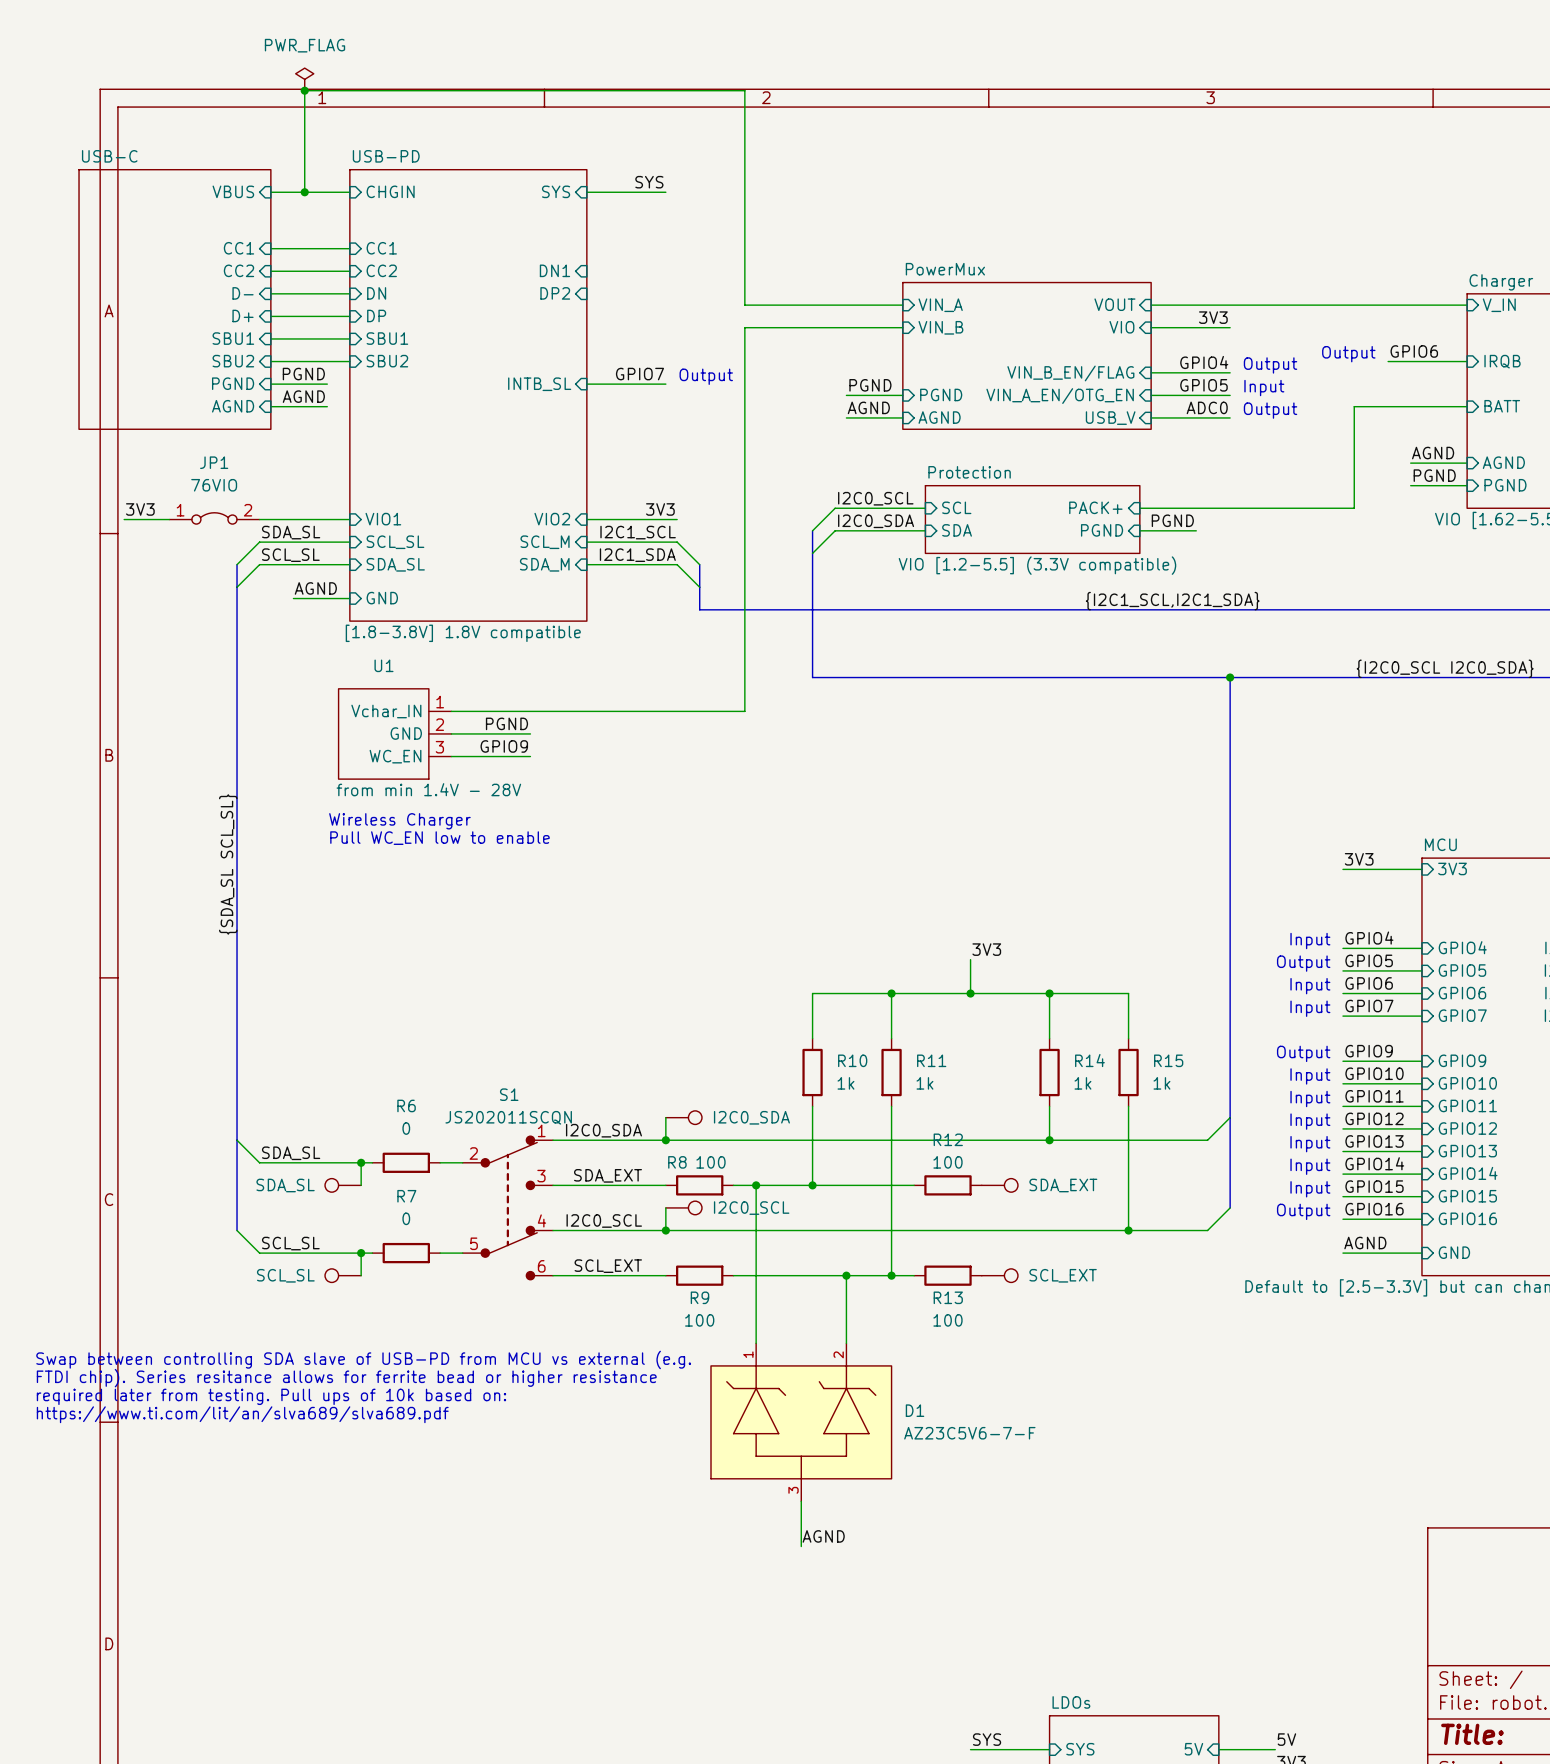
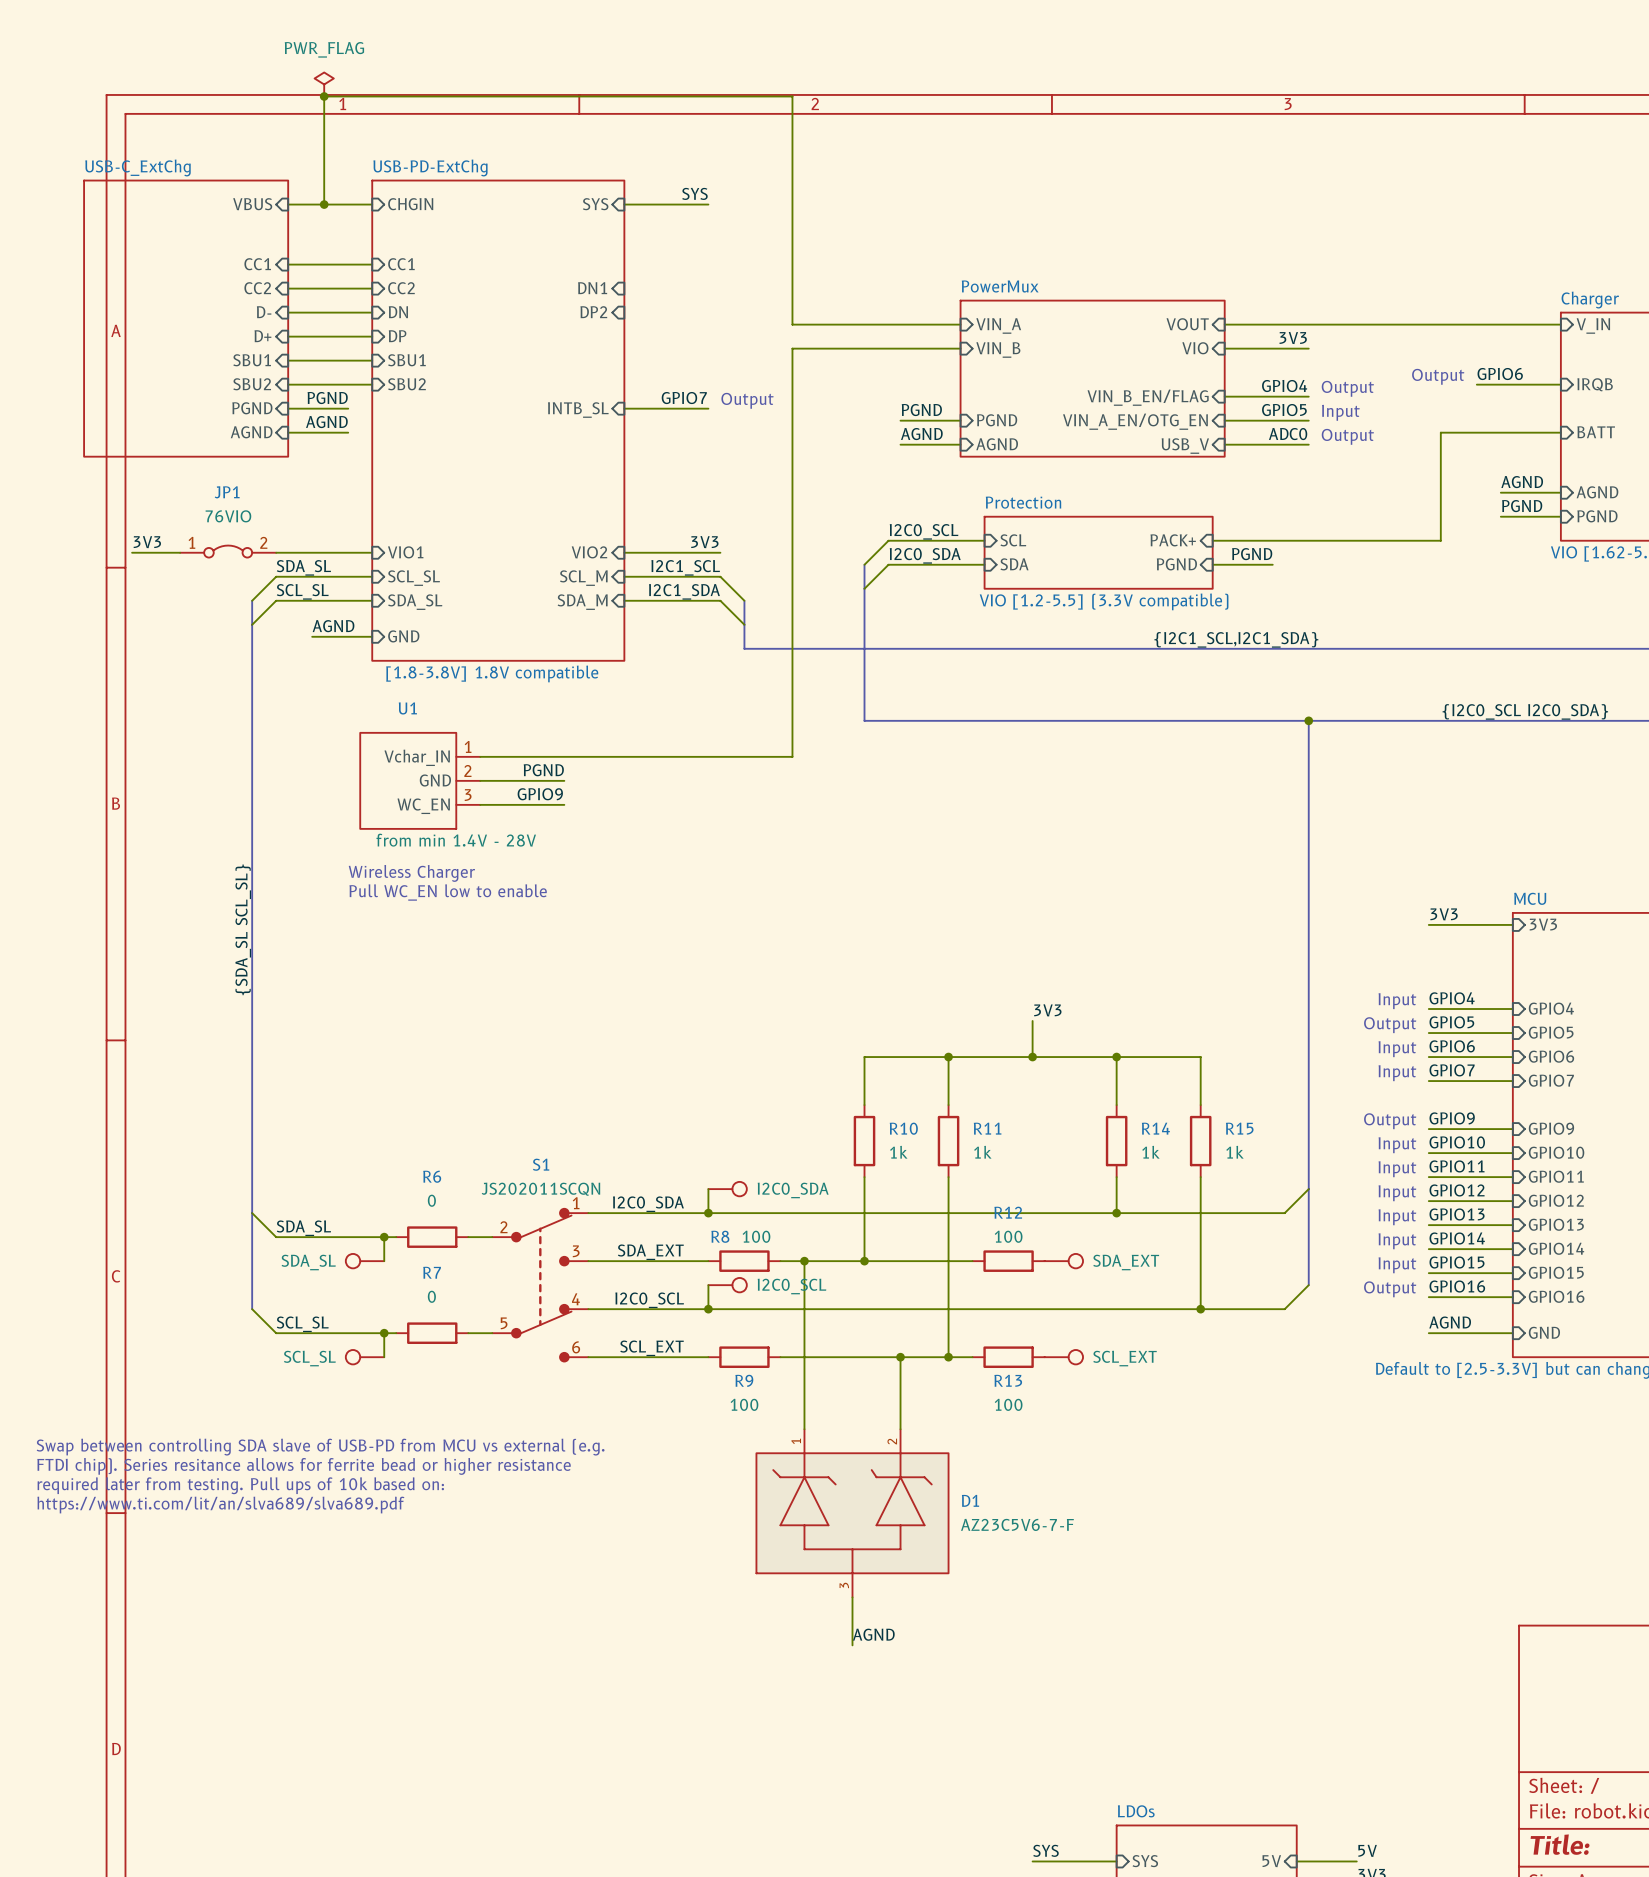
sheet USB-C name: USB-C (109, 156) -> USB-C_ExtChg (137, 167)
sheet USB-PD name: USB-PD (386, 156) -> USB-PD-ExtChg (430, 167)

